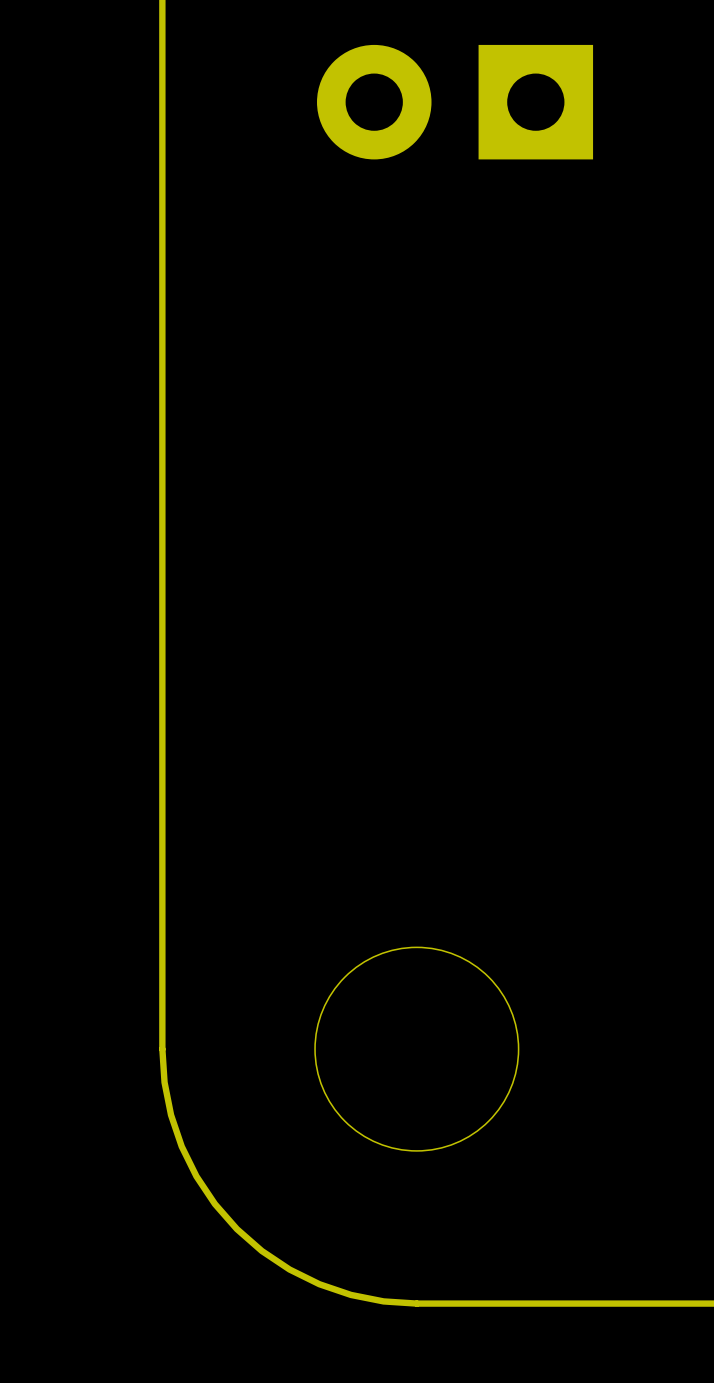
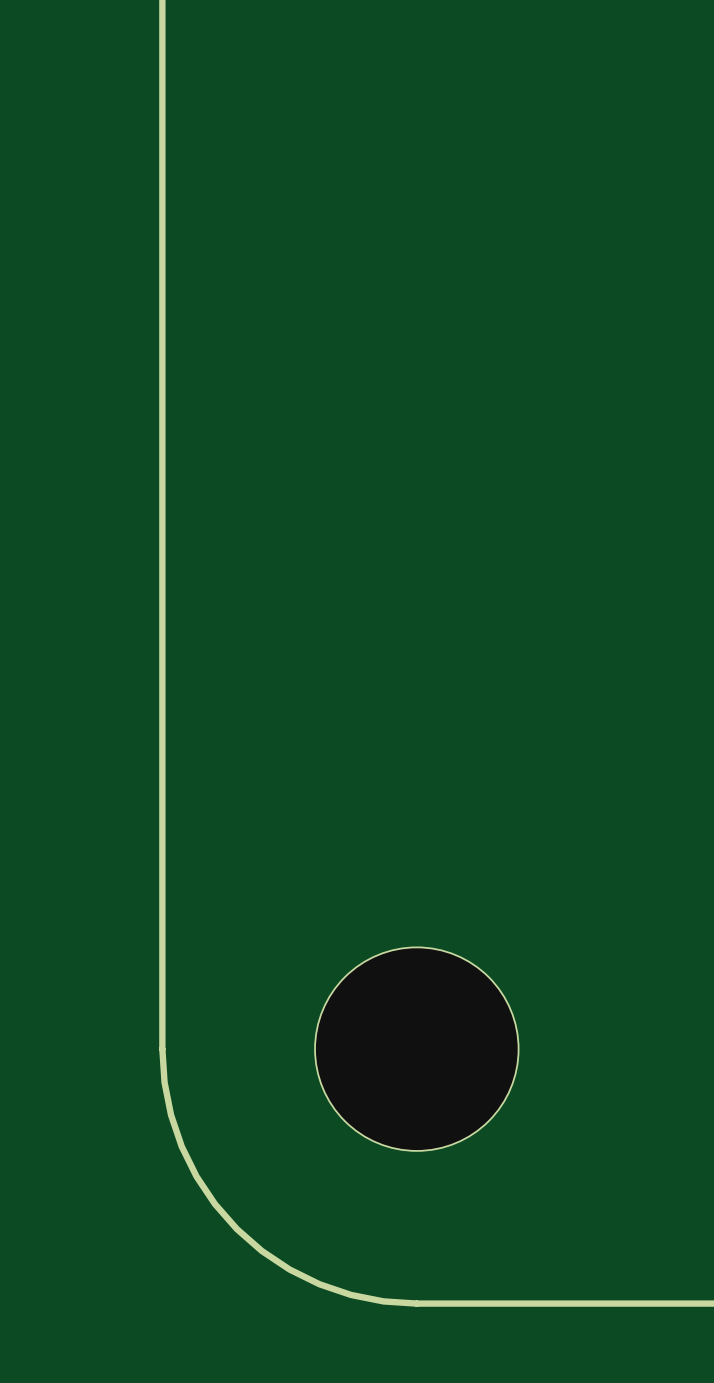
part: (455, 102) -> none

